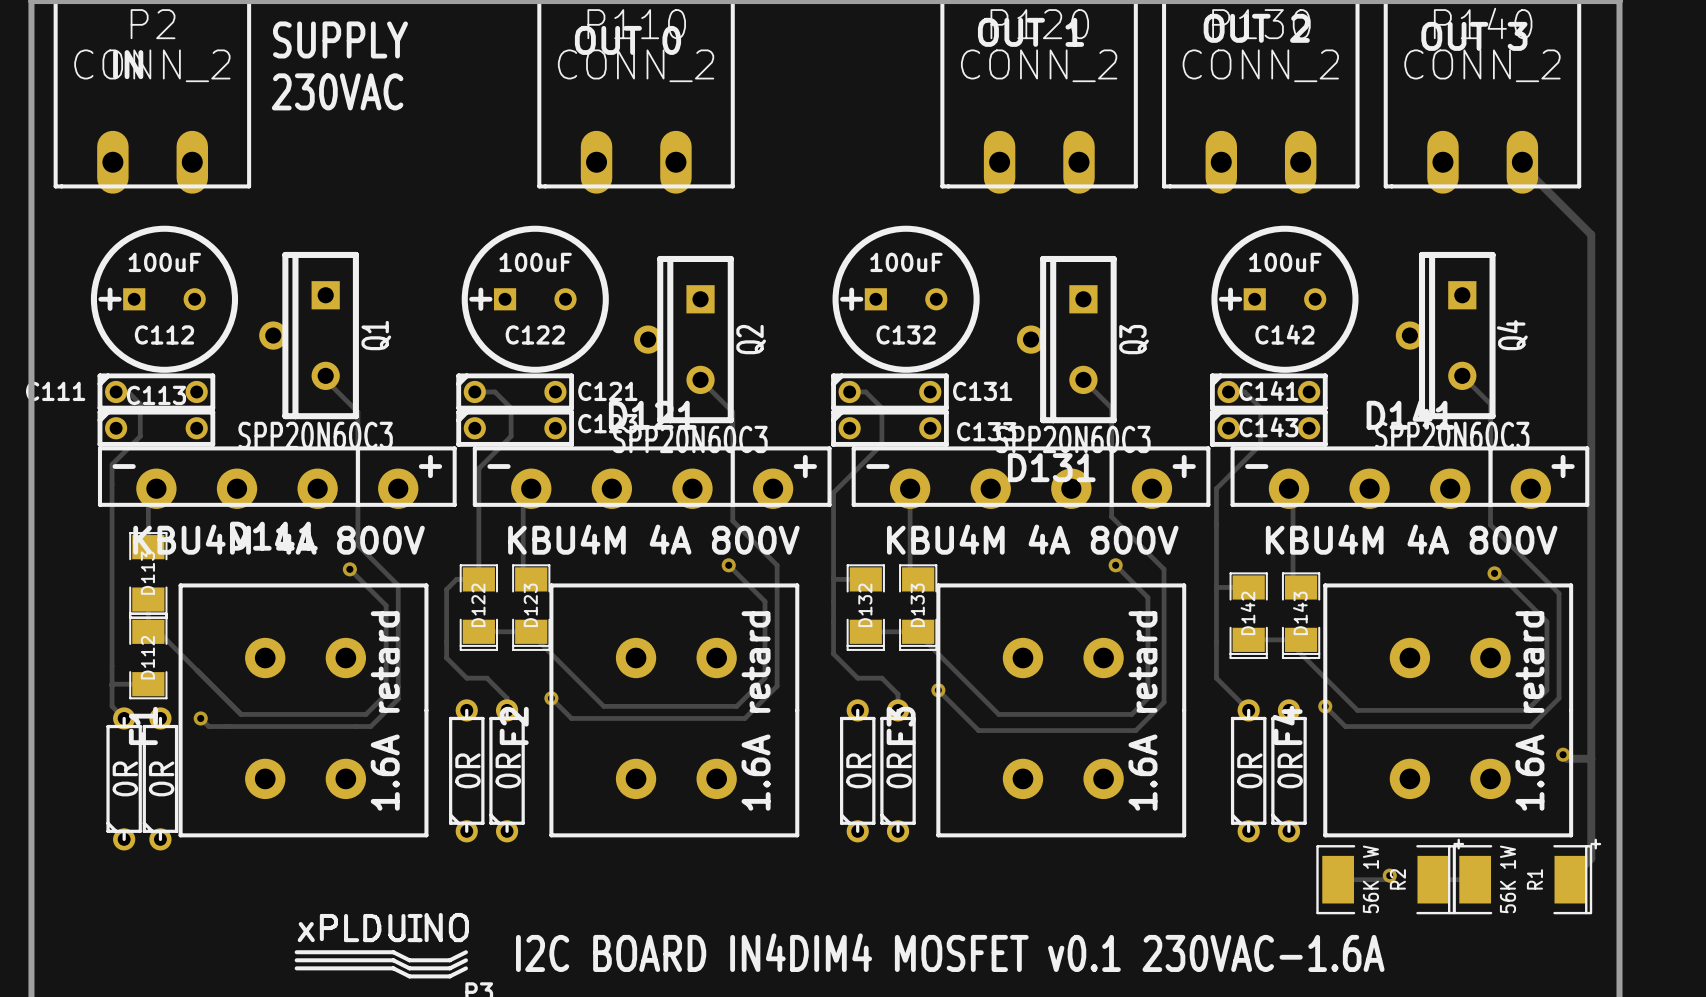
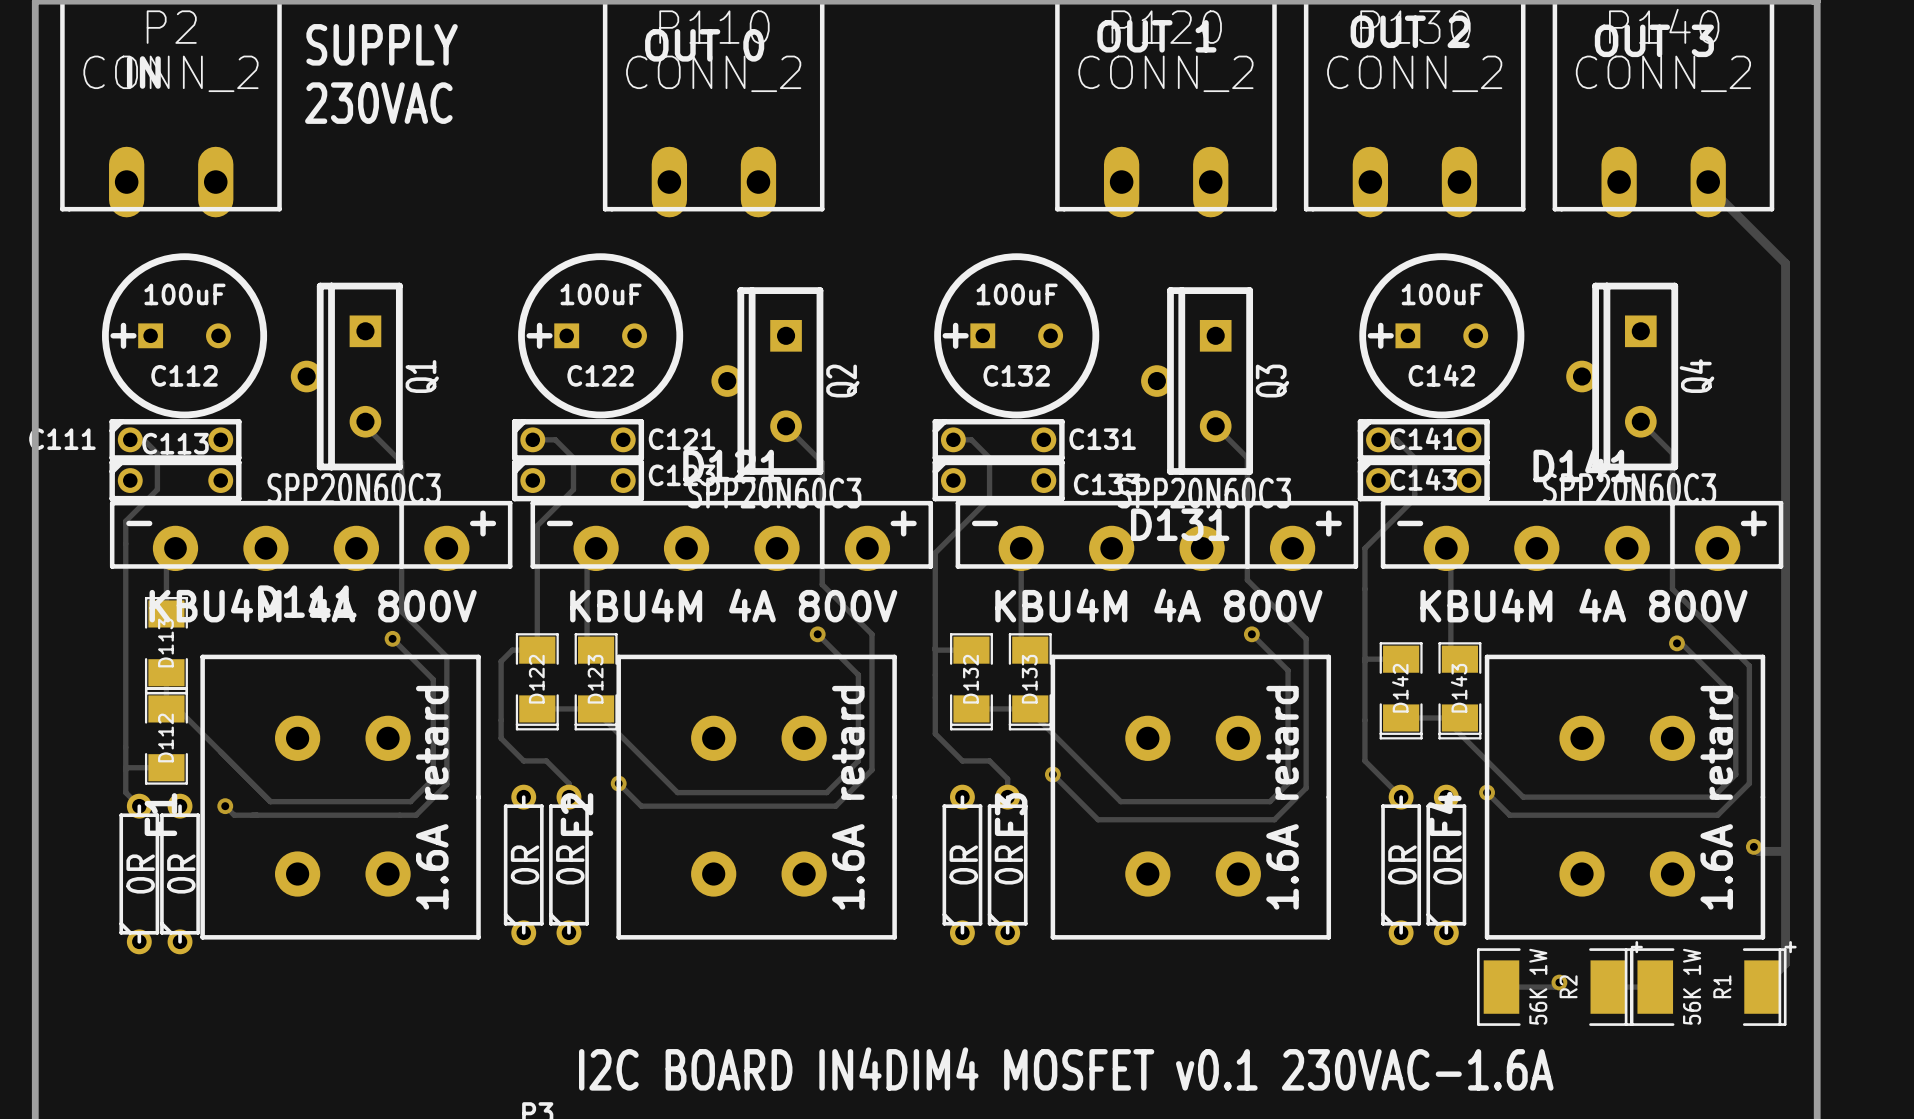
drawing: [294, 912, 469, 979] -> none

